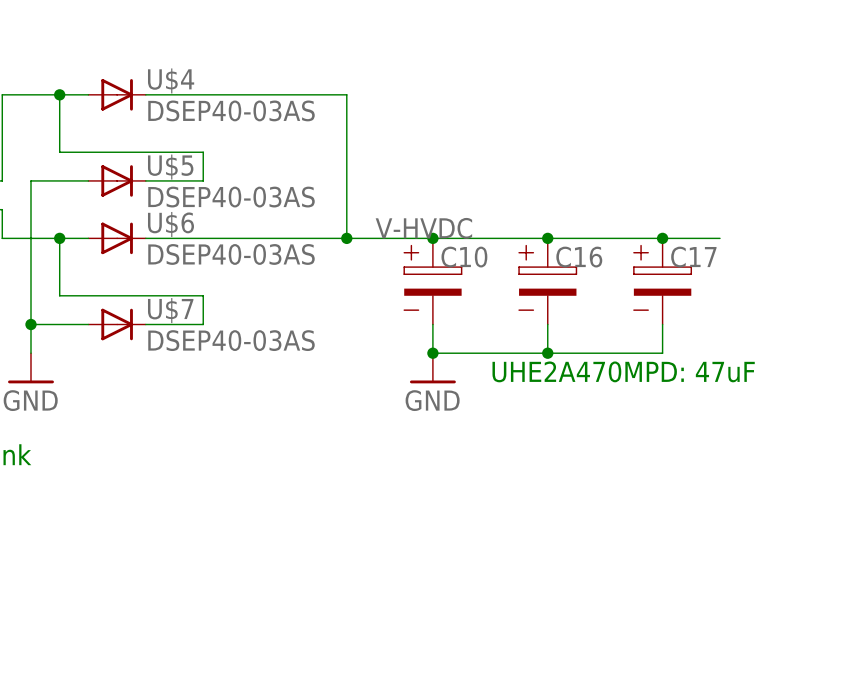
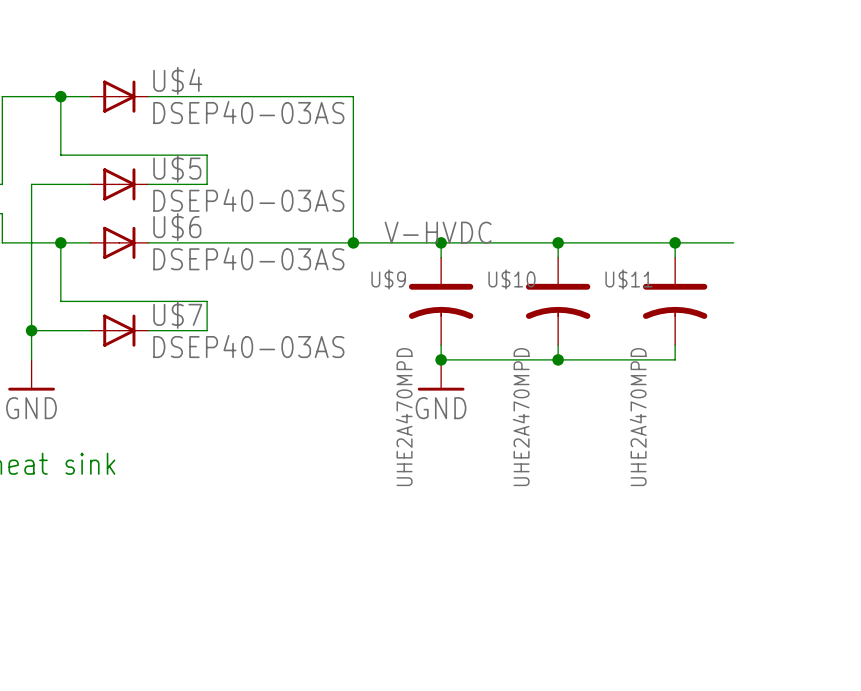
C10: (432, 281) -> none
C16: (547, 281) -> none
C17: (662, 281) -> none
U$9: none -> UHE2A470MPD (441, 301)
U$10: none -> UHE2A470MPD (558, 301)
U$11: none -> UHE2A470MPD (675, 301)
text: UHE2A470MPD: 47uF (623, 371) -> none

